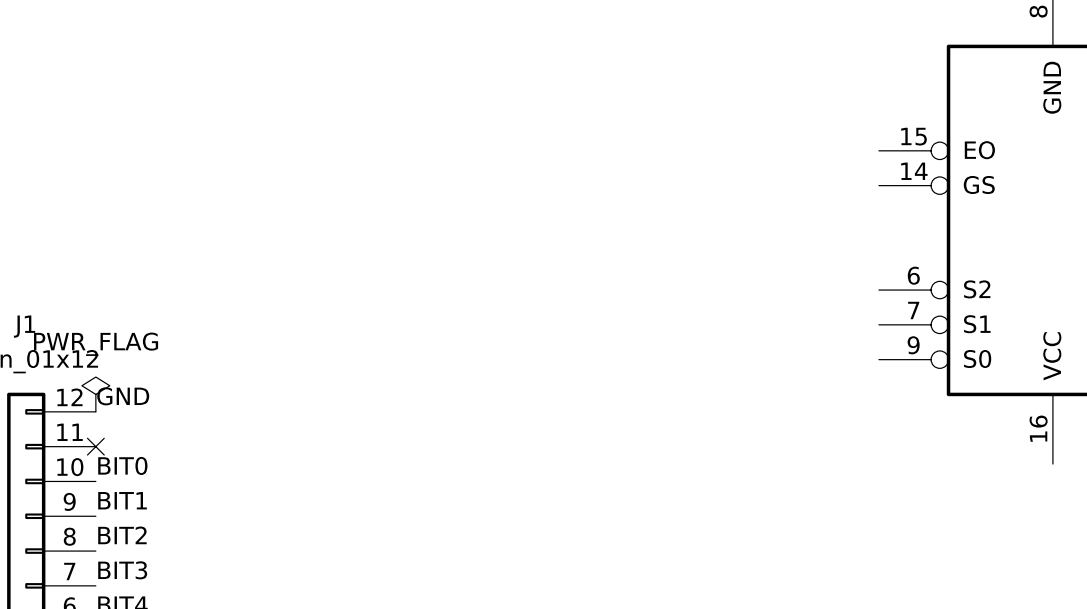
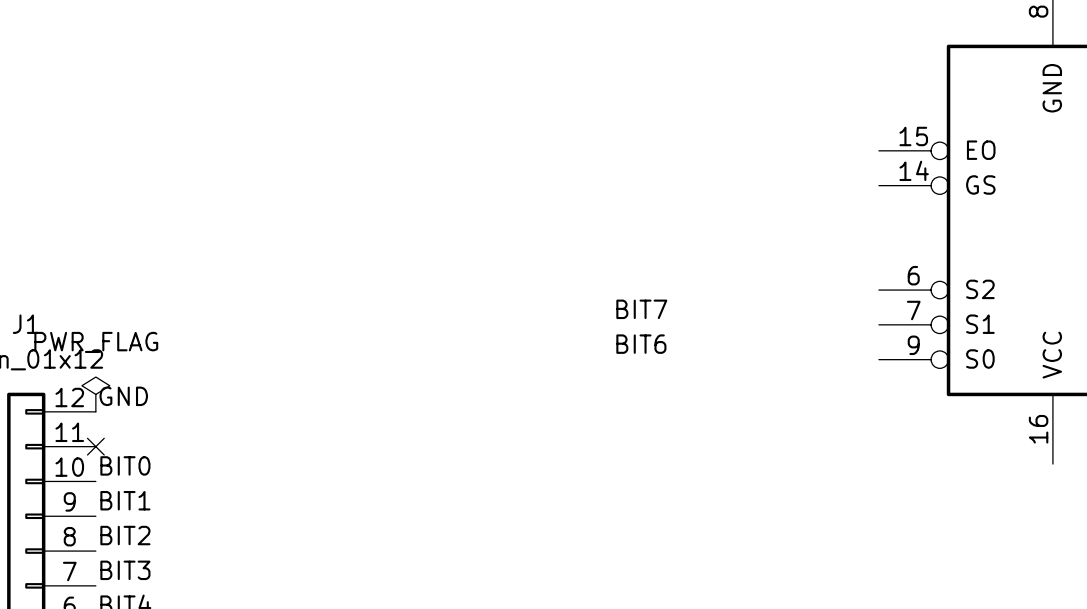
label: none -> BIT7 (641, 309)
label: none -> BIT6 (641, 344)

